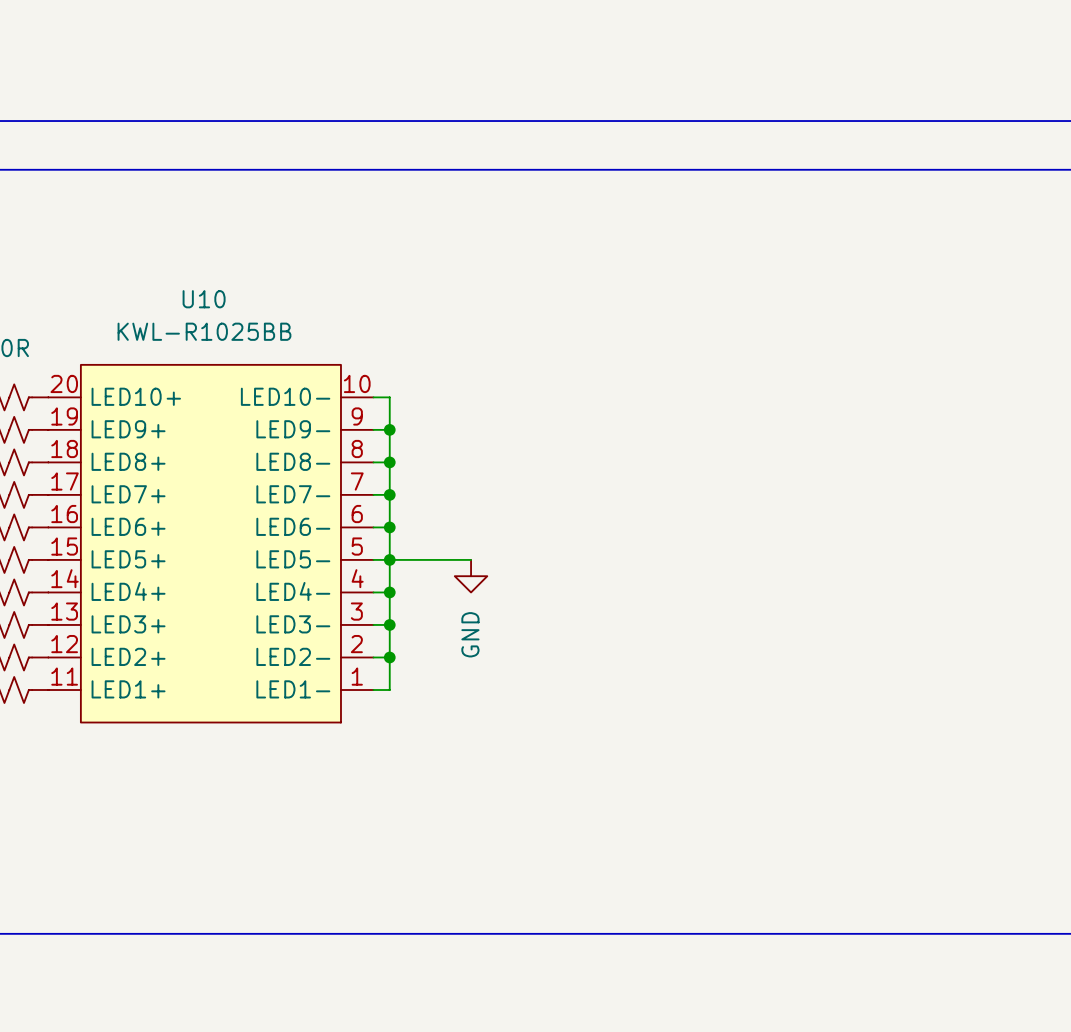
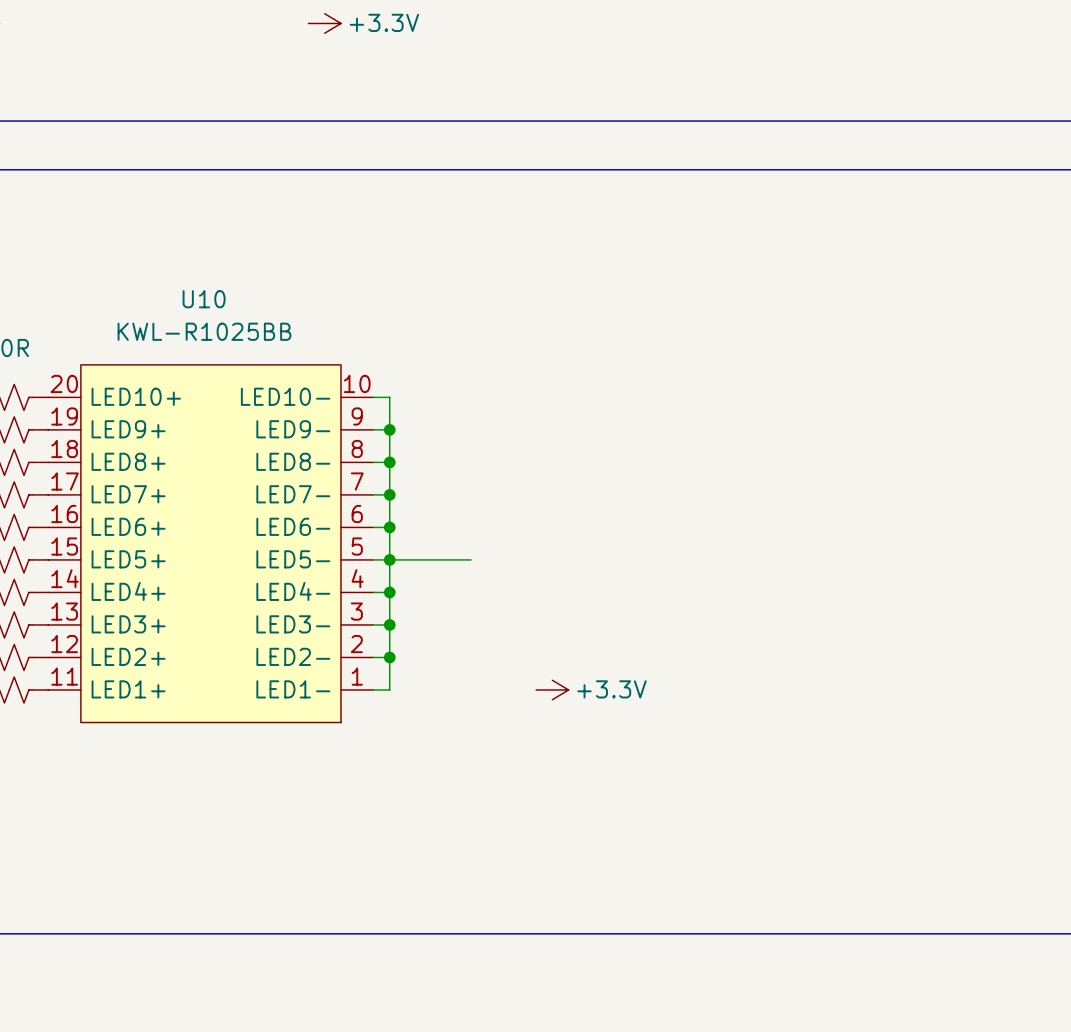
power symbol: none -> +3.3V (324, 23)
power symbol: GND (471, 576) -> none
power symbol: none -> +3.3V (552, 690)

